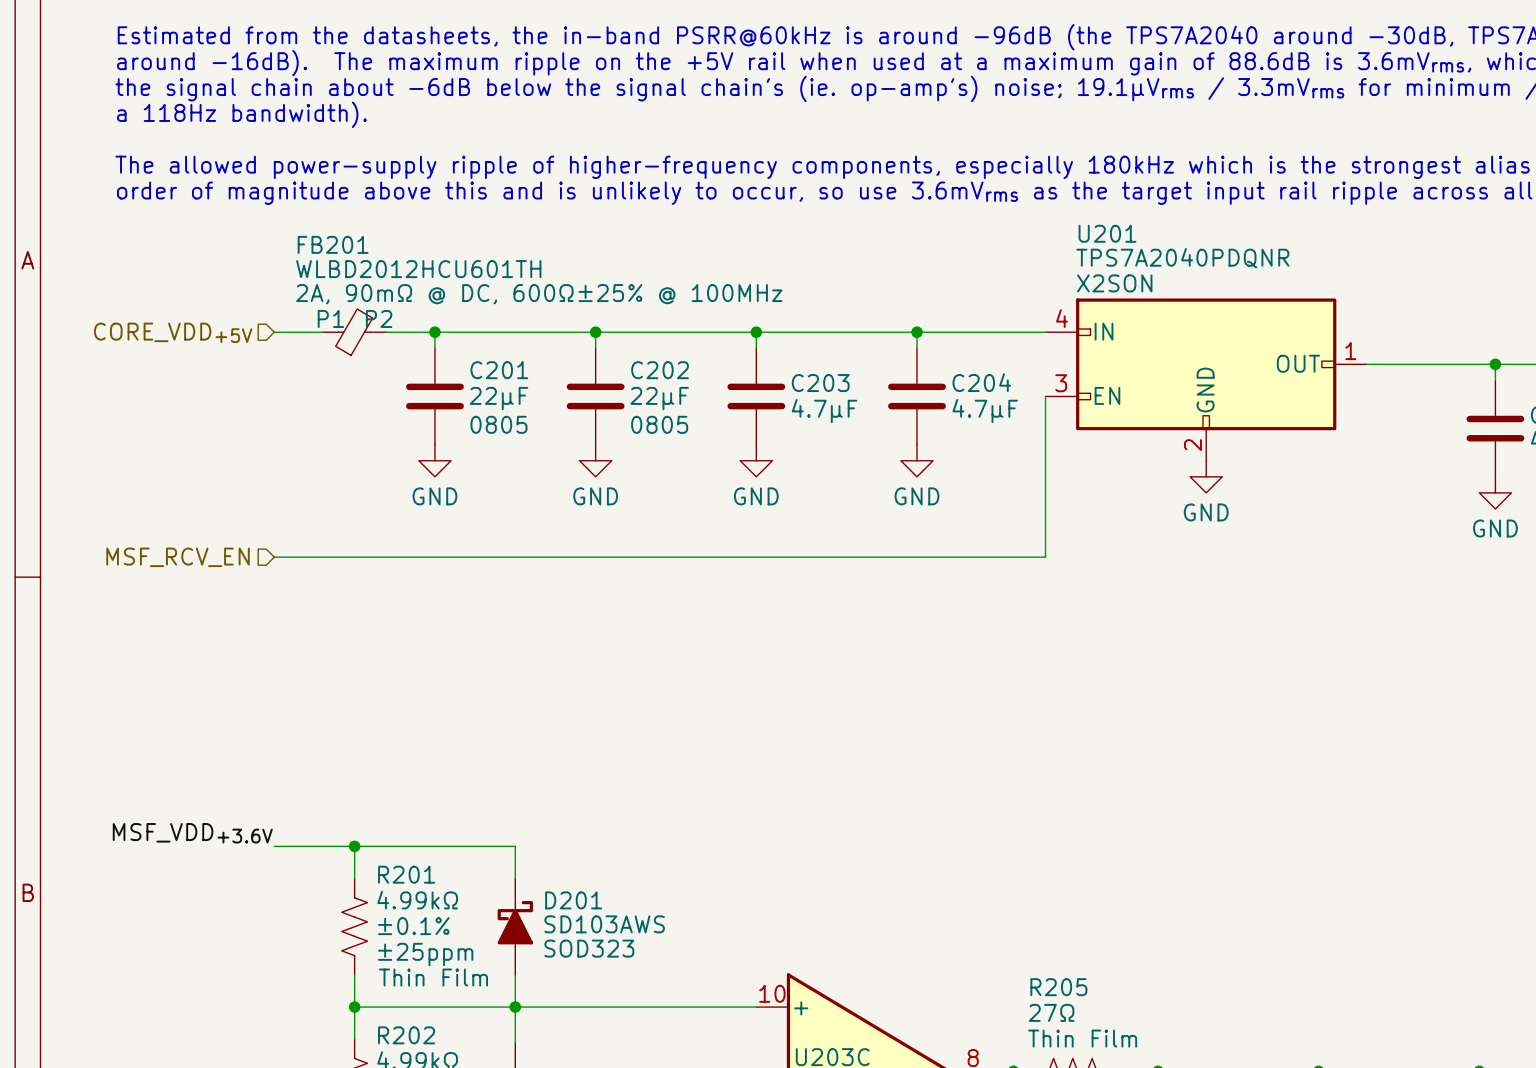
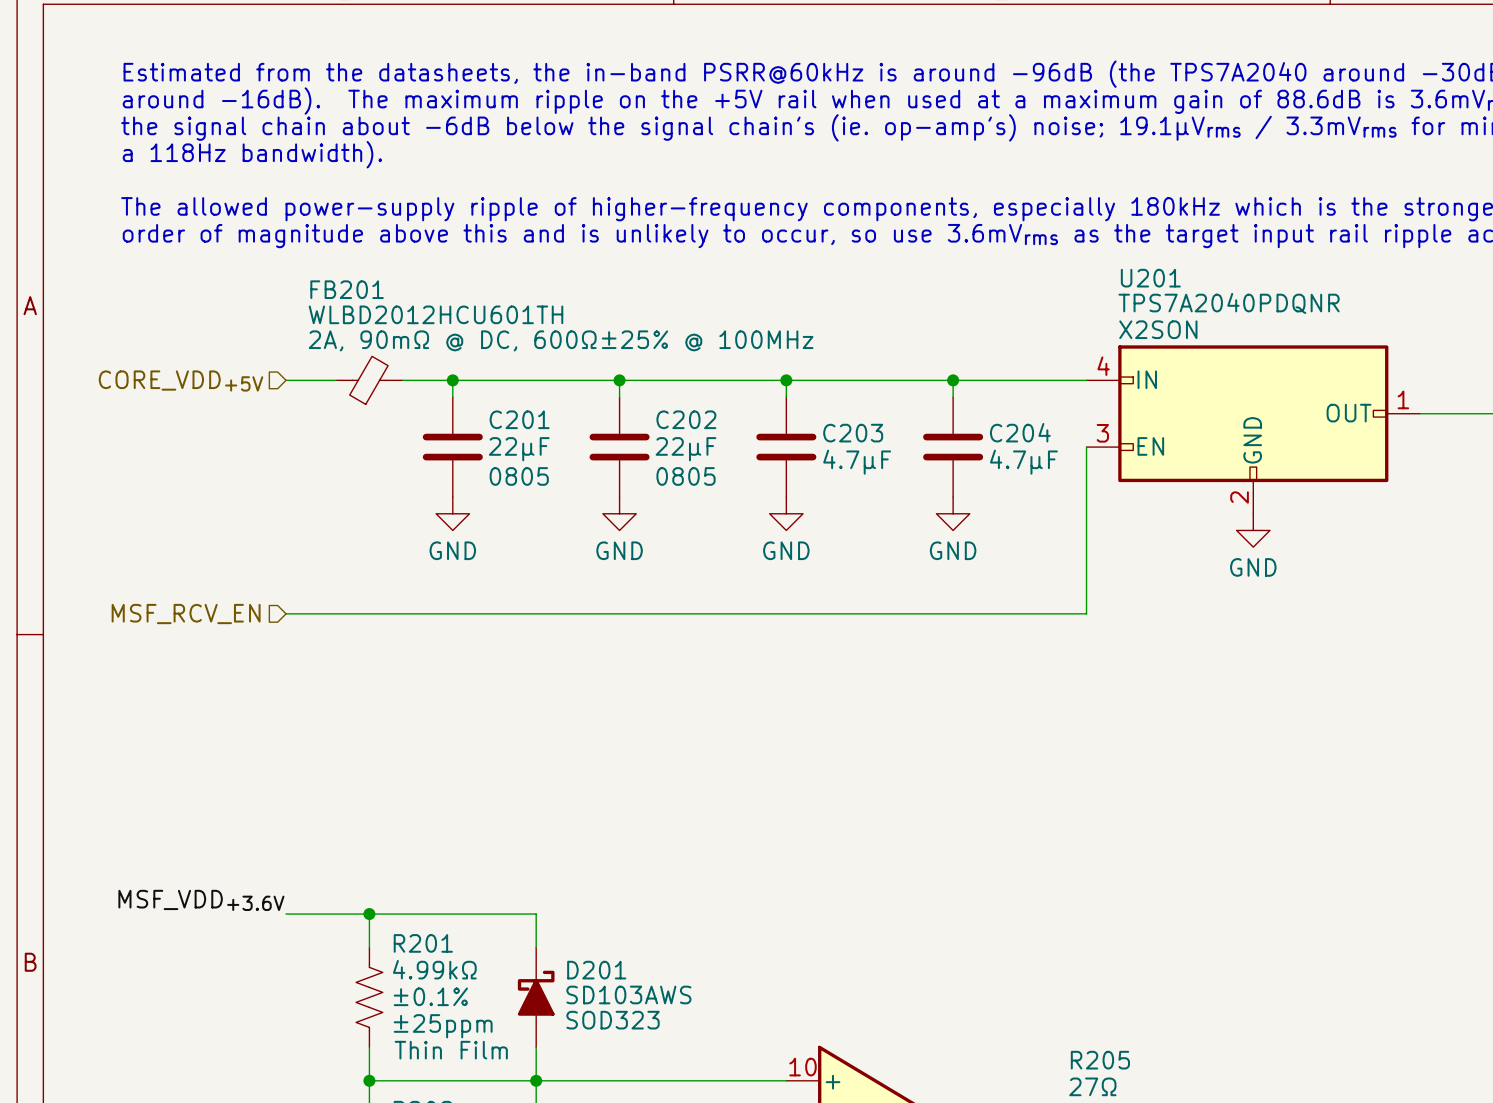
FB201 pin name: P1 (330, 318) -> none
FB201 pin name: P2 (379, 318) -> none

